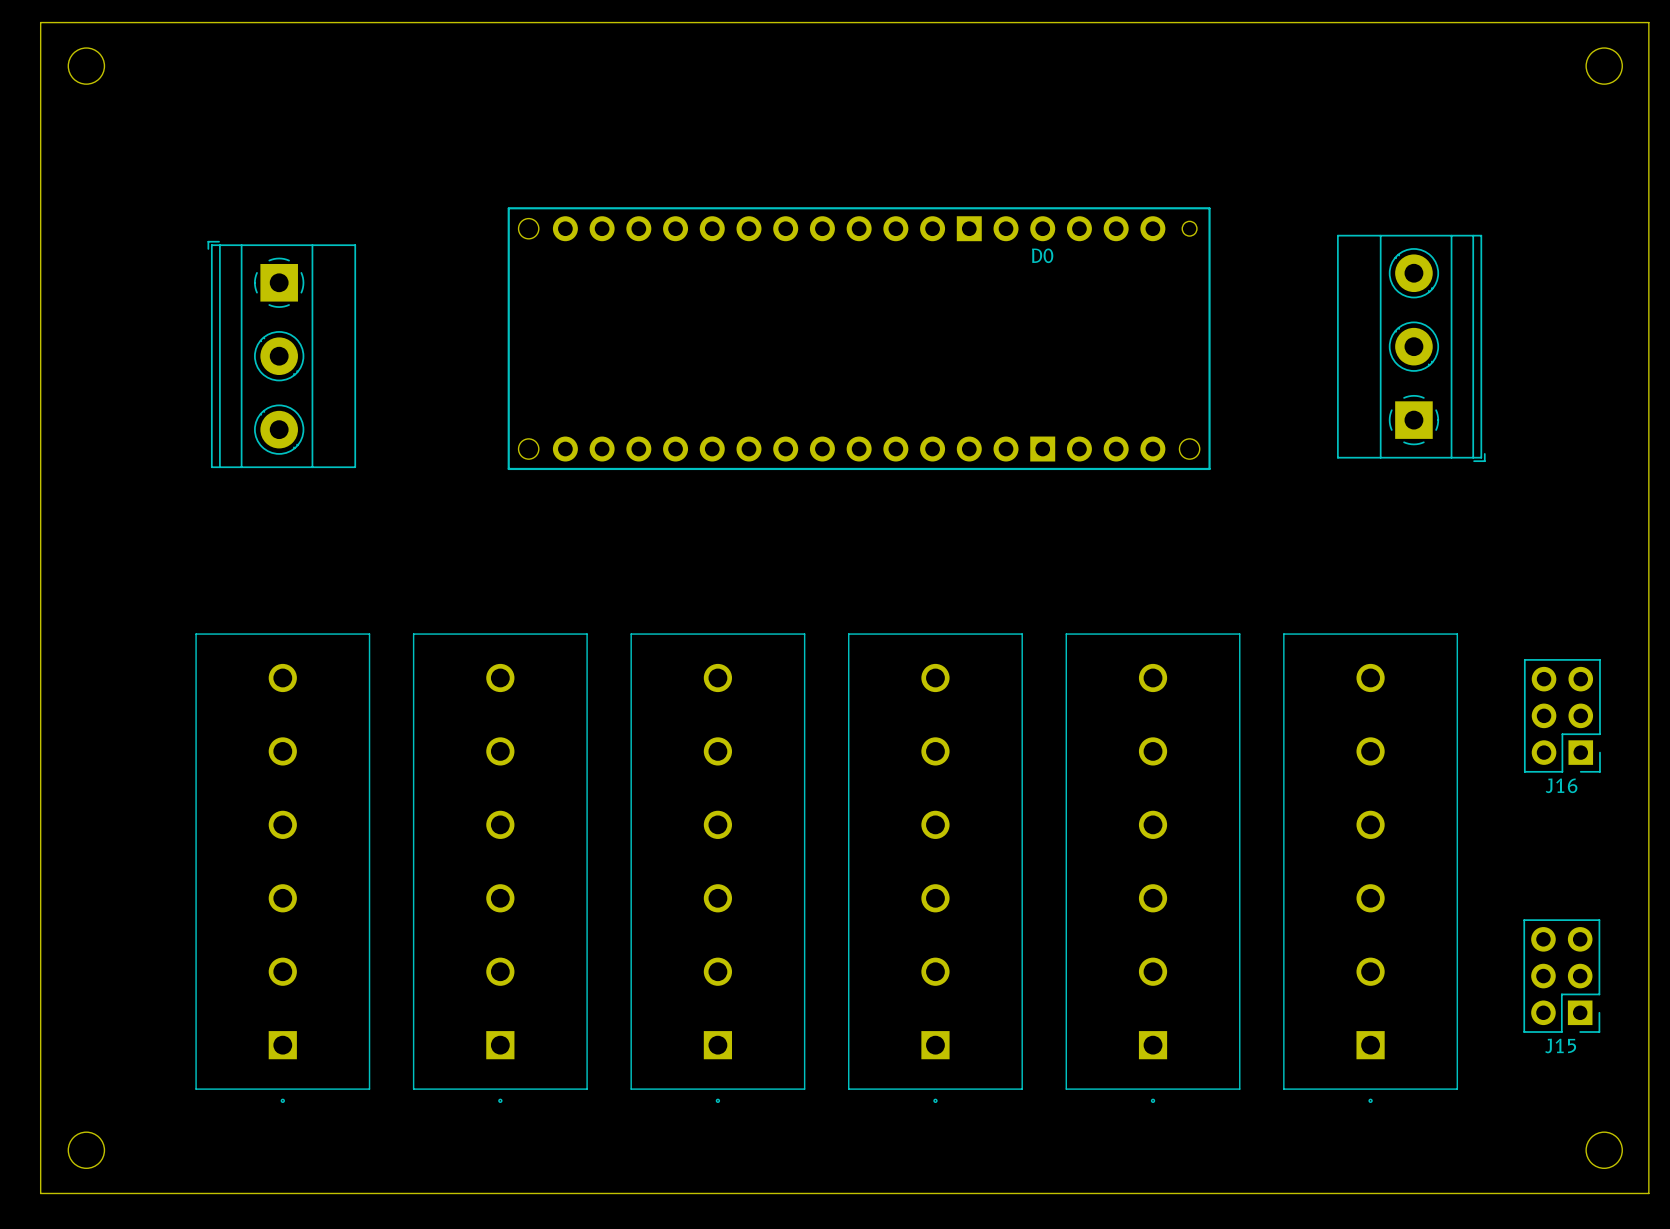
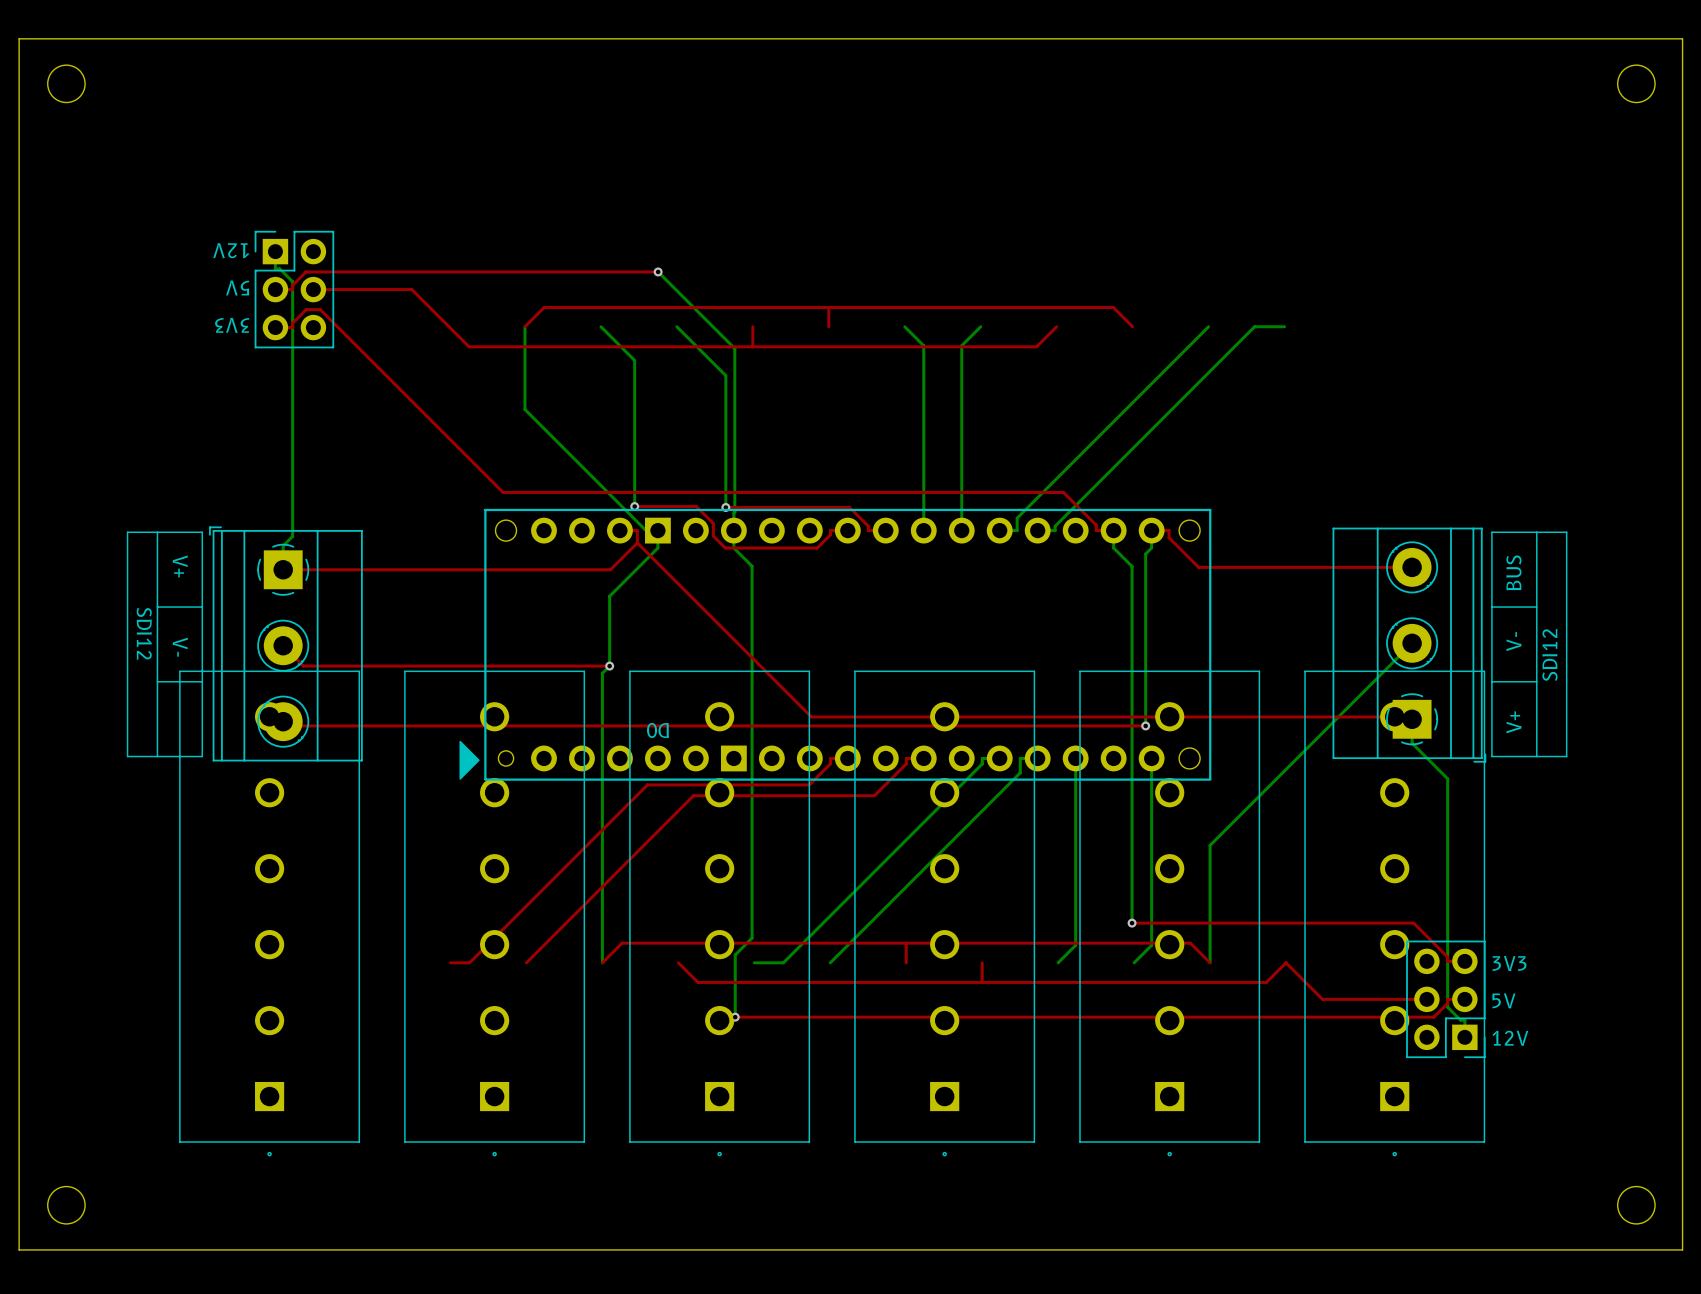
text: none -> 12V (231, 250)
bottom track: none -> (275, 251) (275, 268) (279, 268) (292, 281) (292, 536) (283, 545) (283, 569)
top track: none -> (658, 271) (305, 271) (292, 285) (292, 289) (275, 289)
bottom track: none -> (658, 271) (734, 348) (733, 548) (752, 566) (752, 938) (735, 954) (735, 1017)
via: none -> (658, 271)
text: none -> 5V (237, 288)
part: none -> (294, 289)
top track: none -> (313, 289) (411, 289) (469, 346) (1036, 346) (1056, 326)
top track: none -> (828, 307) (828, 326)
text: none -> 3V3 (232, 325)
top track: none -> (524, 326) (544, 307) (1113, 307) (1132, 326)
bottom track: none -> (524, 326) (524, 409) (653, 537) (657, 537)
bottom track: none -> (600, 326) (634, 360) (634, 506)
bottom track: none -> (676, 326) (725, 375) (725, 507)
top track: none -> (752, 326) (752, 346)
bottom track: none -> (904, 326) (923, 345) (923, 530)
bottom track: none -> (980, 326) (961, 345) (961, 530)
bottom track: none -> (1208, 326) (1017, 518) (1017, 530) (999, 530)
bottom track: none -> (1284, 326) (1254, 326) (1055, 526) (1055, 530) (1037, 530)
top track: none -> (275, 327) (292, 327) (292, 323) (306, 309) (320, 309) (503, 492) (1063, 492) (1096, 525) (1096, 530) (1113, 530)
part rotation: 0° (859, 338) -> 180° (847, 644)
part position: (1411, 348) -> (1409, 645)
part position: (281, 354) -> (285, 643)
top track: none -> (634, 506) (696, 506) (713, 523) (713, 536) (725, 548) (817, 548) (830, 534) (830, 530) (847, 530)
via: none -> (634, 506)
top track: none -> (725, 507) (849, 507) (868, 526) (868, 530) (885, 530)
via: none -> (725, 507)
top track: none -> (619, 530) (637, 530) (637, 542)
bottom track: none -> (657, 530) (657, 548) (609, 596) (609, 666) (602, 673) (602, 962)
bottom track: none -> (1113, 530) (1113, 548) (1132, 566) (1132, 923)
top track: none -> (1151, 530) (1169, 530) (1169, 537) (1198, 567) (1412, 567)
bottom track: none -> (1151, 530) (1151, 548) (1145, 553) (1145, 725)
line: none -> (127, 532) (202, 532) (202, 756) (127, 756) (127, 532)
line: none -> (157, 532) (157, 756)
line: none -> (1491, 532) (1566, 532) (1566, 756) (1491, 756) (1491, 532)
line: none -> (1536, 532) (1536, 756)
top track: none -> (637, 542) (811, 716) (1385, 716) (1388, 719) (1412, 719)
top track: none -> (637, 542) (610, 569) (283, 569)
text: none -> V+ (180, 566)
text: none -> BUS (1513, 572)
line: none -> (157, 607) (202, 607)
line: none -> (1491, 607) (1536, 607)
text: none -> SDI12 (144, 633)
text: none -> V- (1513, 641)
bottom track: none -> (1412, 643) (1210, 845) (1210, 962)
top track: none -> (283, 645) (303, 666) (609, 666)
text: none -> V- (180, 647)
text: none -> SDI12 (1549, 655)
via: none -> (609, 666)
line: none -> (157, 681) (202, 681)
line: none -> (1491, 681) (1536, 681)
bottom track: none -> (1412, 719) (1412, 743) (1447, 778) (1447, 1007) (1460, 1020) (1464, 1020) (1464, 1037)
top track: none -> (283, 721) (287, 725) (1145, 725)
text: none -> V+ (1513, 722)
via: none -> (1145, 725)
drawing: none -> [459, 740, 480, 780]
J16: (1562, 715) -> none
top track: none -> (847, 758) (830, 758) (830, 763) (809, 784) (647, 784) (469, 962) (450, 962)
top track: none -> (923, 758) (906, 758) (906, 763) (874, 795) (693, 795) (526, 962)
bottom track: none -> (999, 758) (982, 758) (982, 763) (783, 962) (754, 962)
bottom track: none -> (1037, 758) (1020, 758) (1020, 772) (830, 962)
bottom track: none -> (1075, 758) (1075, 945) (1058, 962)
bottom track: none -> (1151, 758) (1151, 945) (1134, 962)
top track: none -> (1132, 923) (1413, 923) (1447, 957) (1447, 961) (1464, 961)
via: none -> (1132, 923)
top track: none -> (906, 943) (906, 962)
top track: none -> (602, 962) (622, 943) (1190, 943) (1210, 962)
top track: none -> (678, 962) (697, 982) (1266, 982) (1286, 962) (1322, 999) (1426, 999)
top track: none -> (982, 962) (982, 982)
text: none -> 3V3 (1509, 963)
part: none -> (1445, 999)
top track: none -> (1464, 999) (1447, 999) (1447, 1003) (1433, 1017) (735, 1017)
text: none -> 5V (1503, 1000)
via: none -> (735, 1017)
J15: (1561, 976) -> none
text: none -> 12V (1510, 1038)

